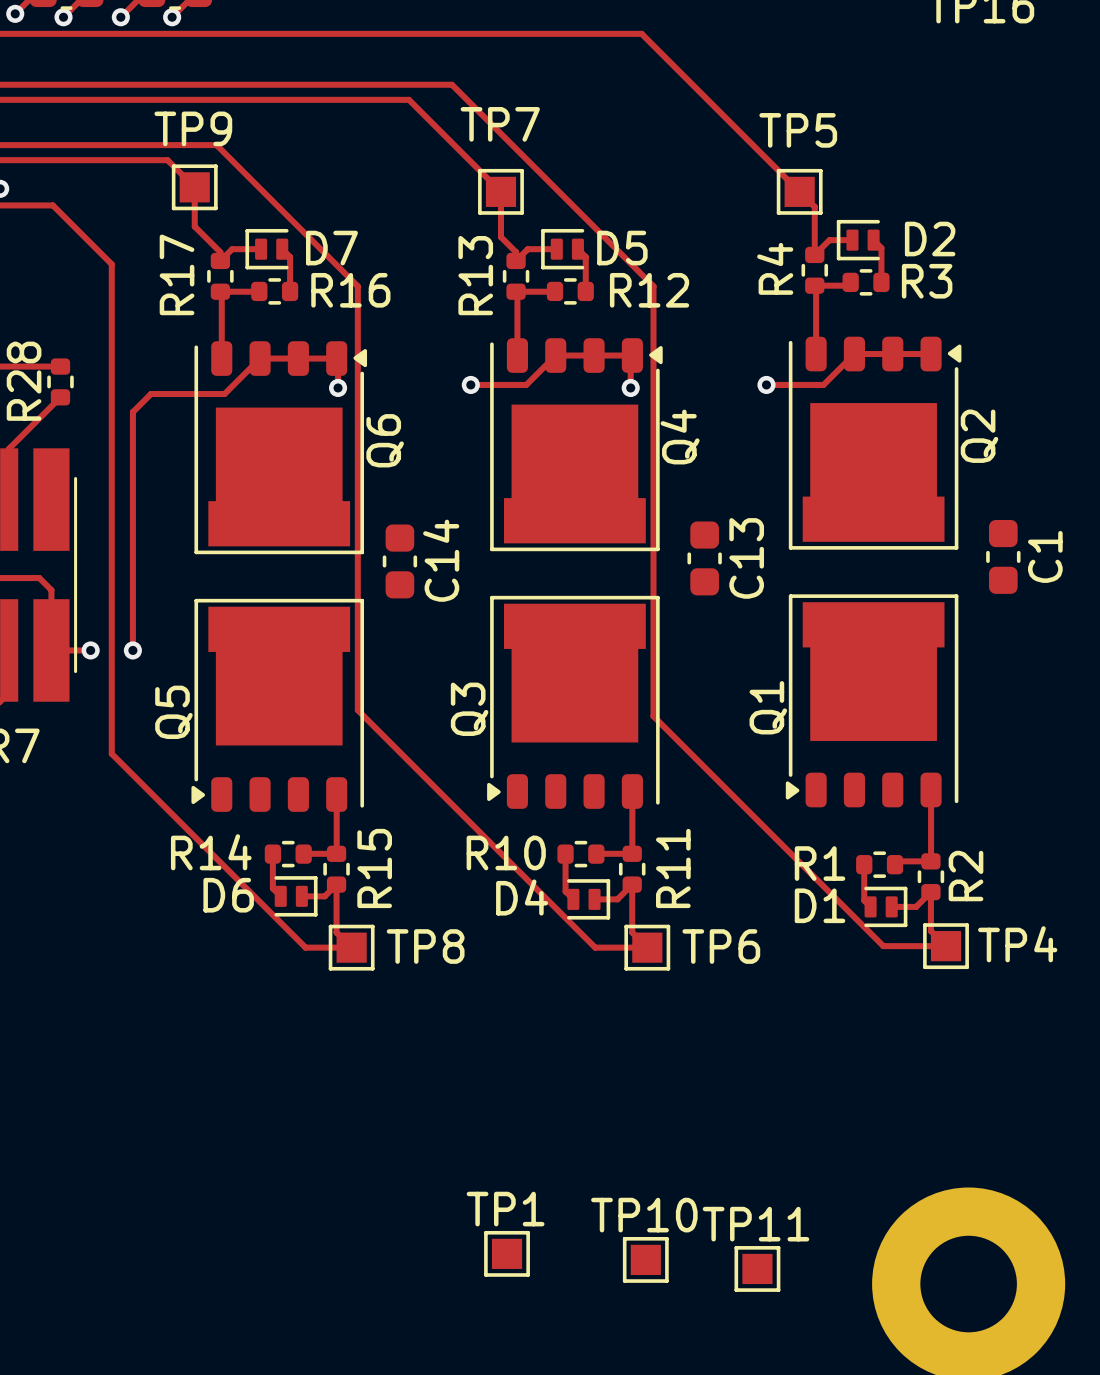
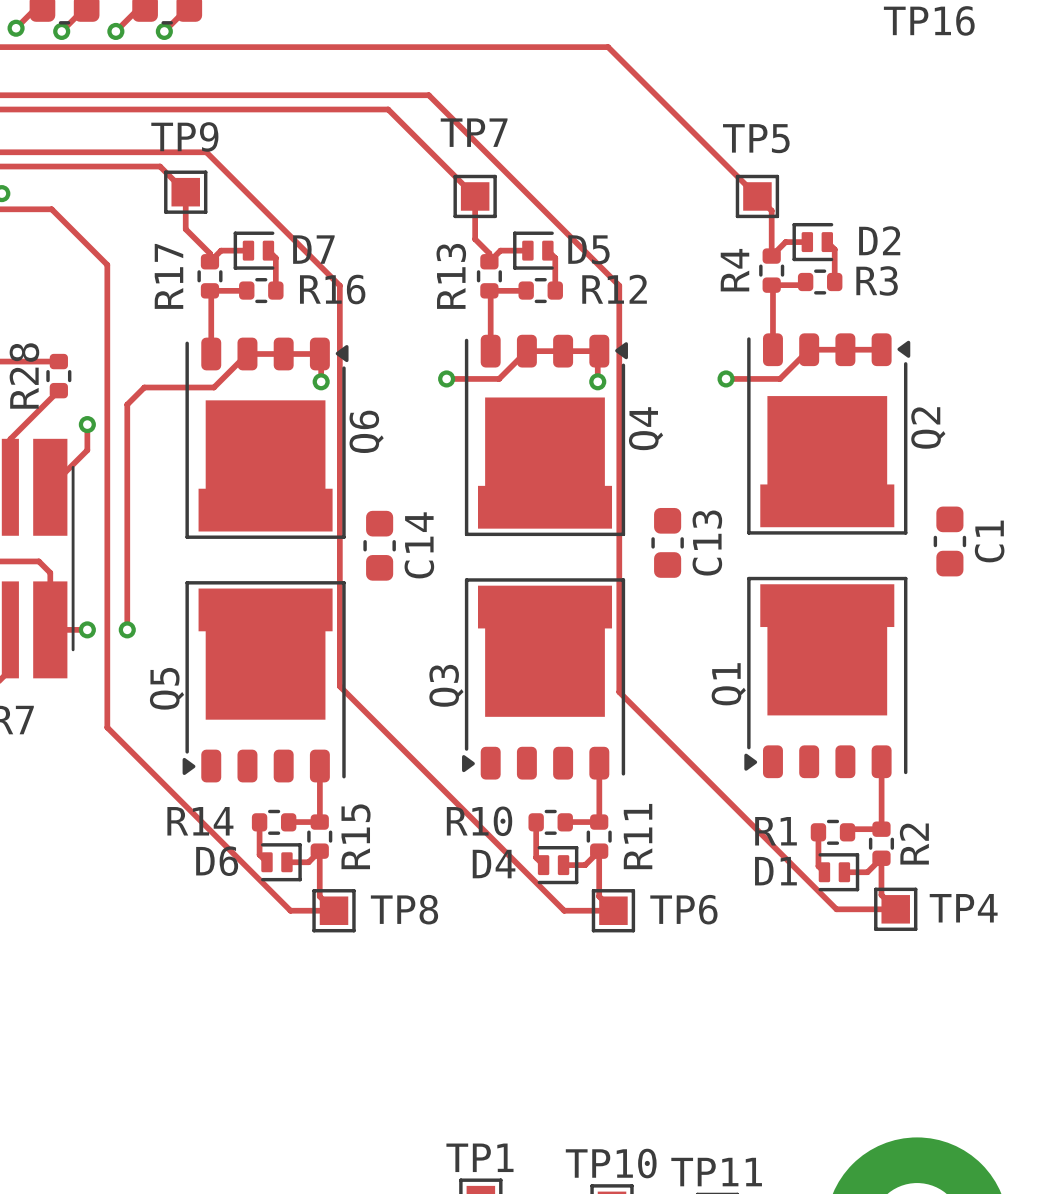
track: none -> (87, 424) (87, 450) (50, 487)
via: none -> (87, 424)

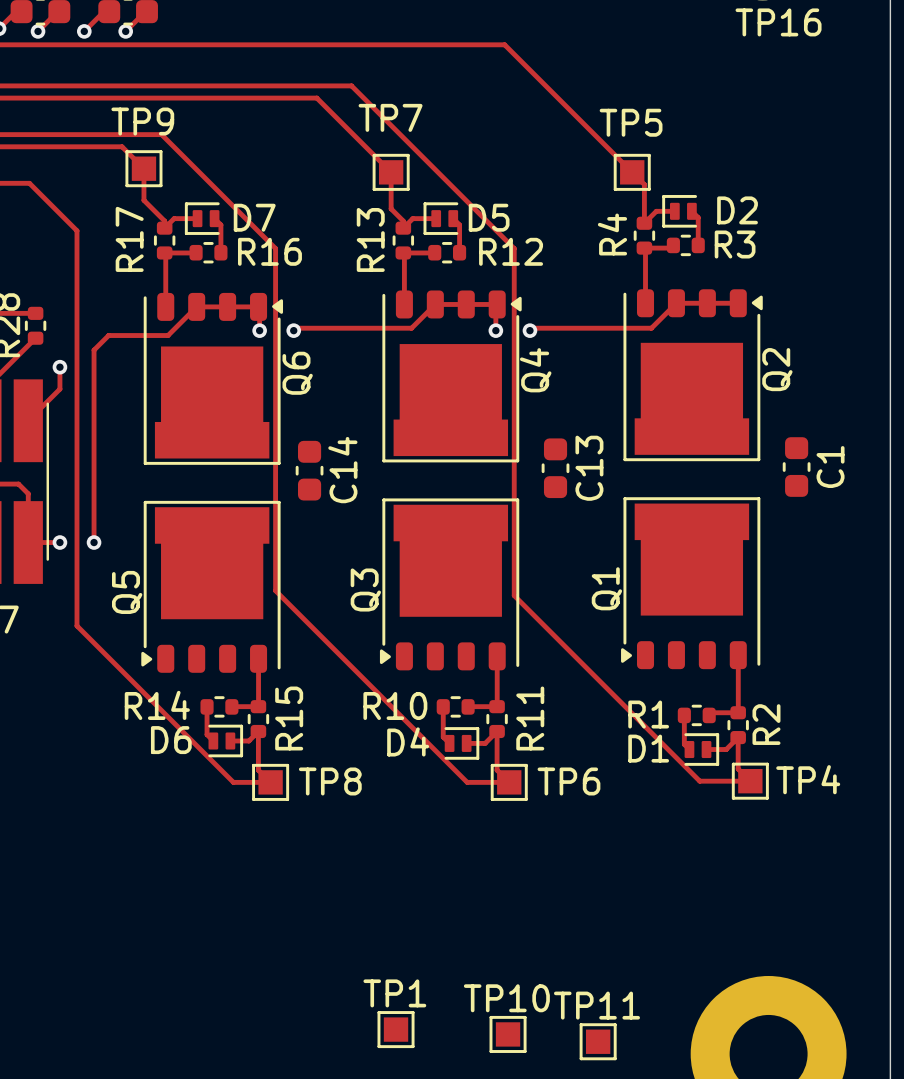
track: none -> (366, 328) (296, 328) (293, 330)
via position: (446, 378) -> (293, 330)
track: none -> (605, 328) (532, 328) (529, 330)
via position: (726, 378) -> (529, 330)

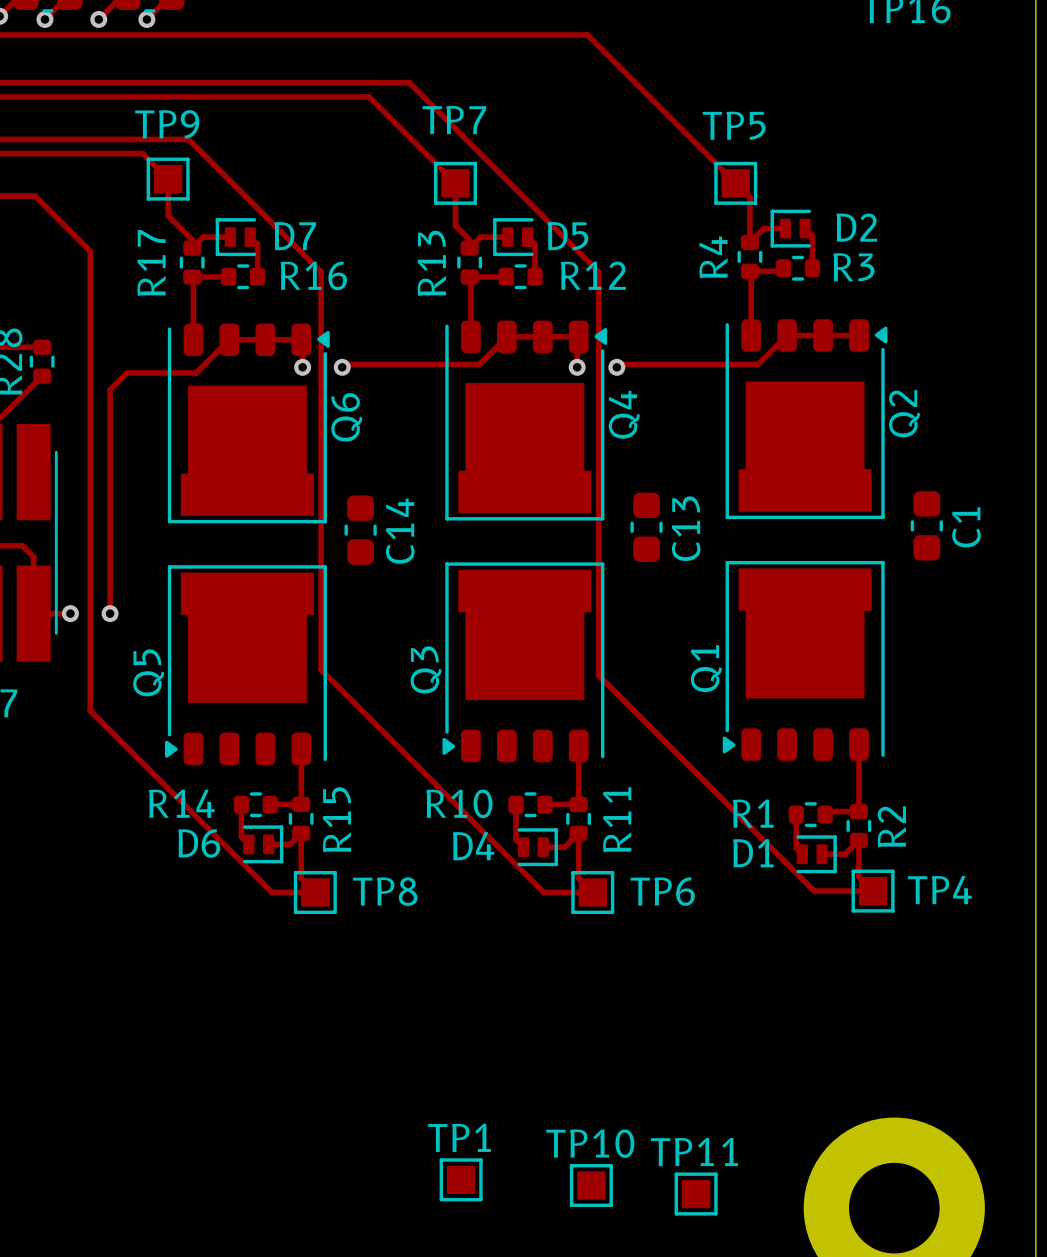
track: (59, 367) (59, 389) (28, 420) -> none
via: (59, 367) -> none

